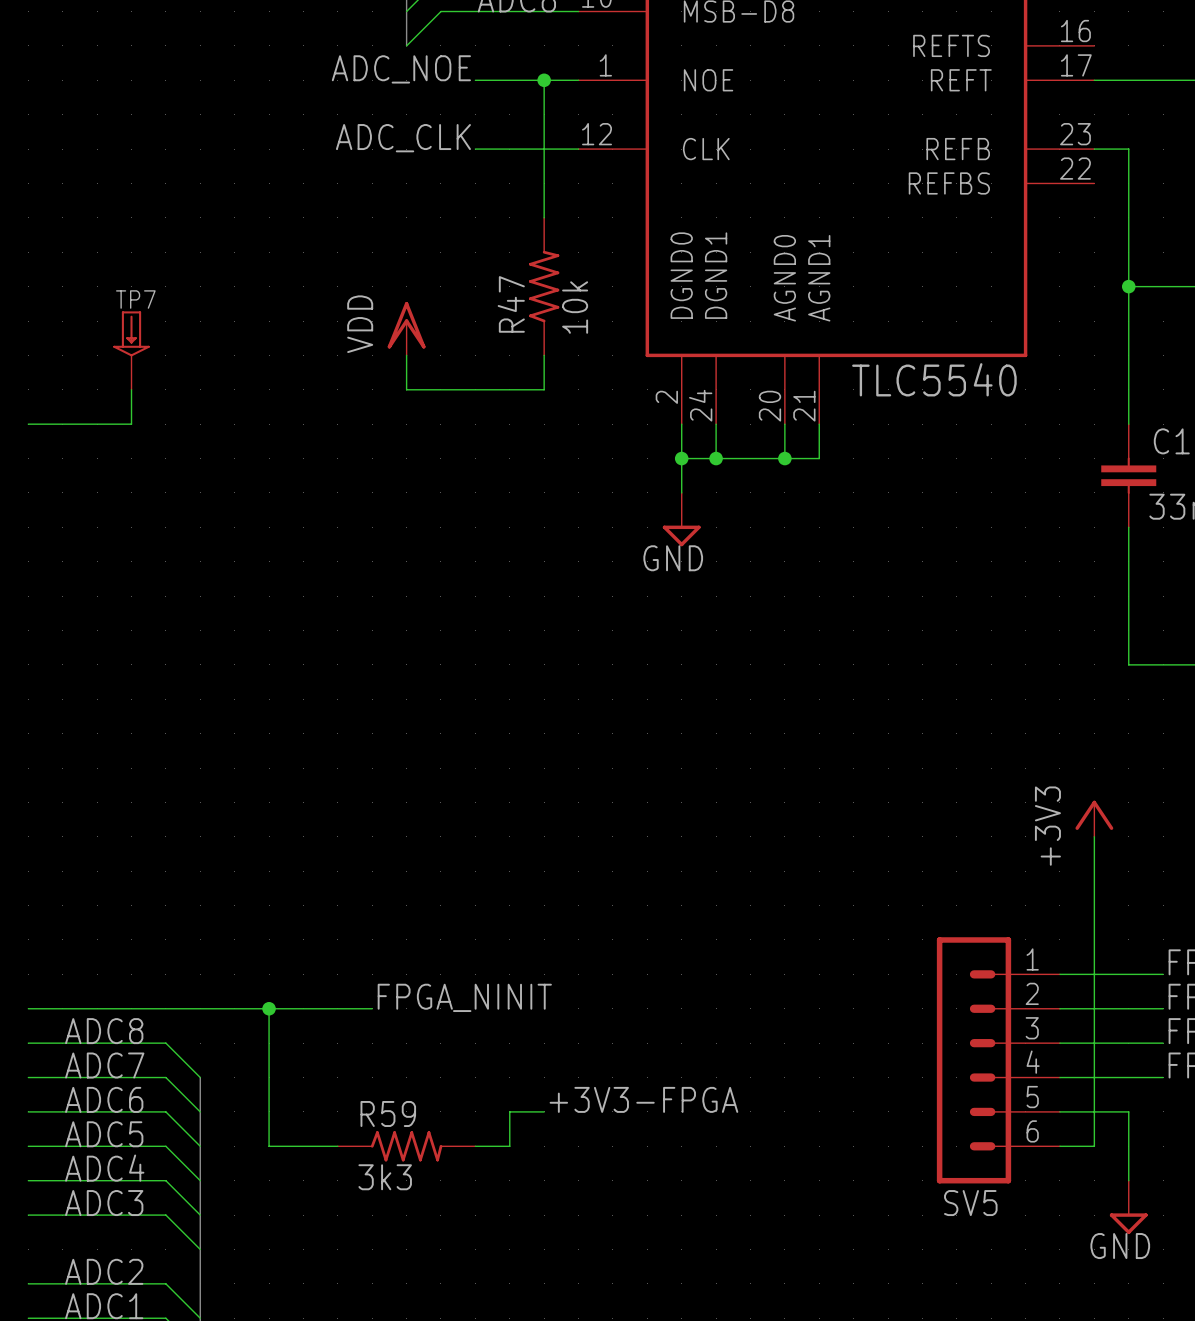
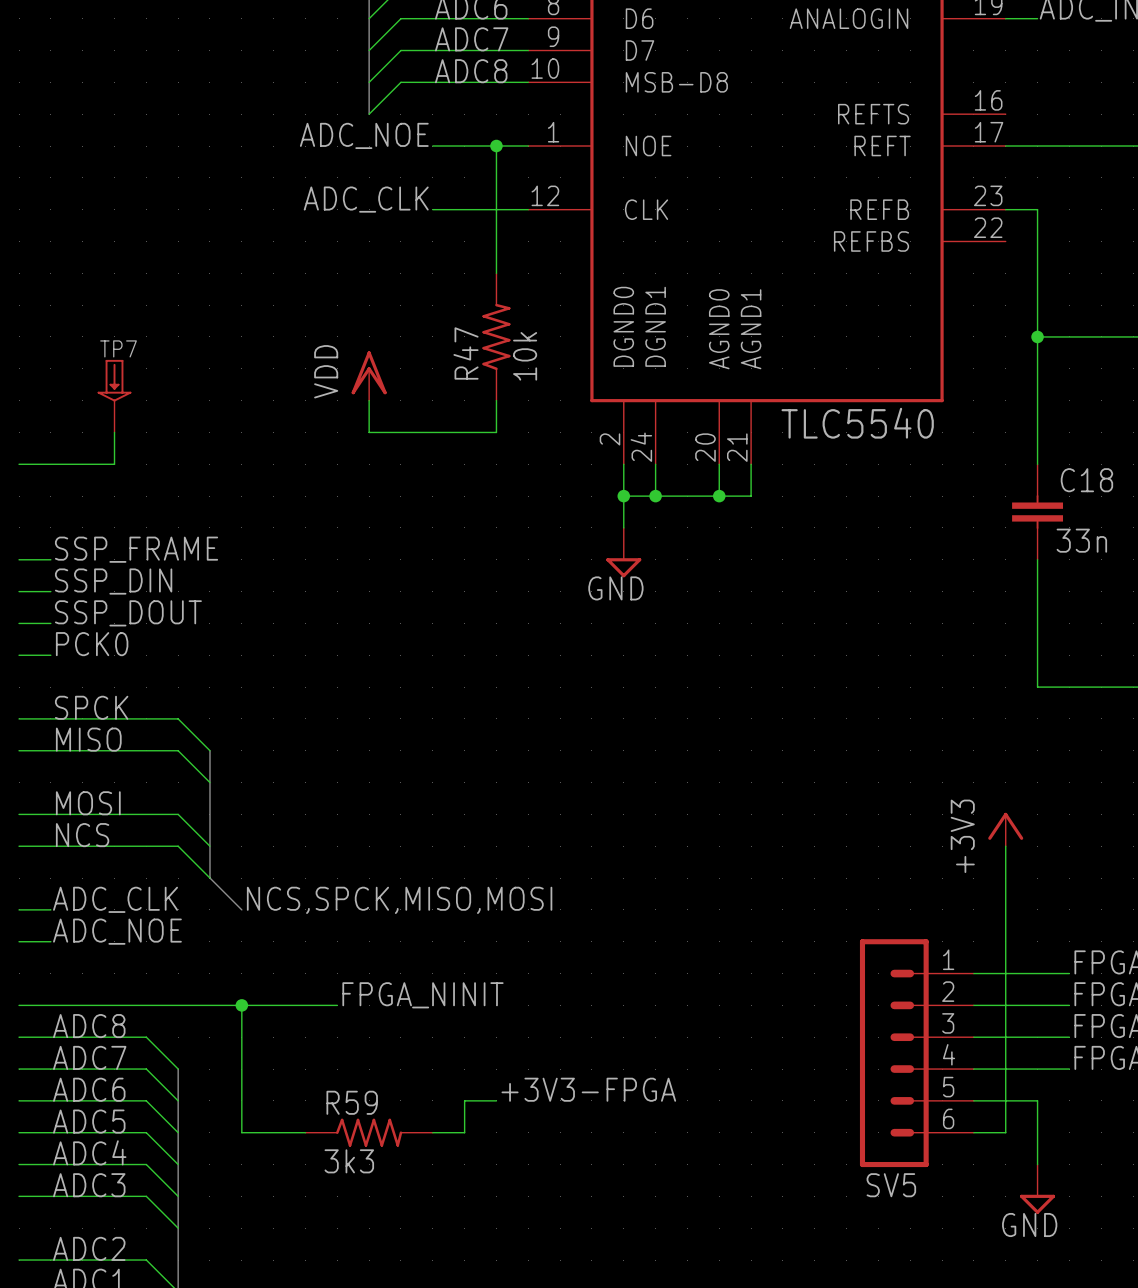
label: none -> SSP_FRAME (136, 549)
wire: none -> (19, 559) (50, 559)
label: none -> SSP_DIN (113, 581)
wire: none -> (19, 591) (50, 591)
label: none -> SSP_DOUT (128, 613)
wire: none -> (19, 623) (50, 623)
label: none -> PCK0 (92, 644)
wire: none -> (19, 655) (50, 655)
label: none -> SPCK (91, 707)
wire: none -> (19, 718) (178, 718) (209, 750)
label: none -> MISO (88, 739)
wire: none -> (19, 750) (178, 750) (209, 782)
bus: none -> (209, 750) (209, 878) (241, 909)
label: none -> MOSI (88, 803)
wire: none -> (19, 814) (178, 814) (209, 846)
label: none -> NCS (82, 835)
wire: none -> (19, 846) (178, 846) (209, 878)
label: none -> ADC_CLK (115, 899)
label: none -> NCS,SPCK,MISO,MOSI (399, 900)
wire: none -> (19, 909) (50, 909)
label: none -> ADC_NOE (117, 931)
wire: none -> (19, 941) (50, 941)

